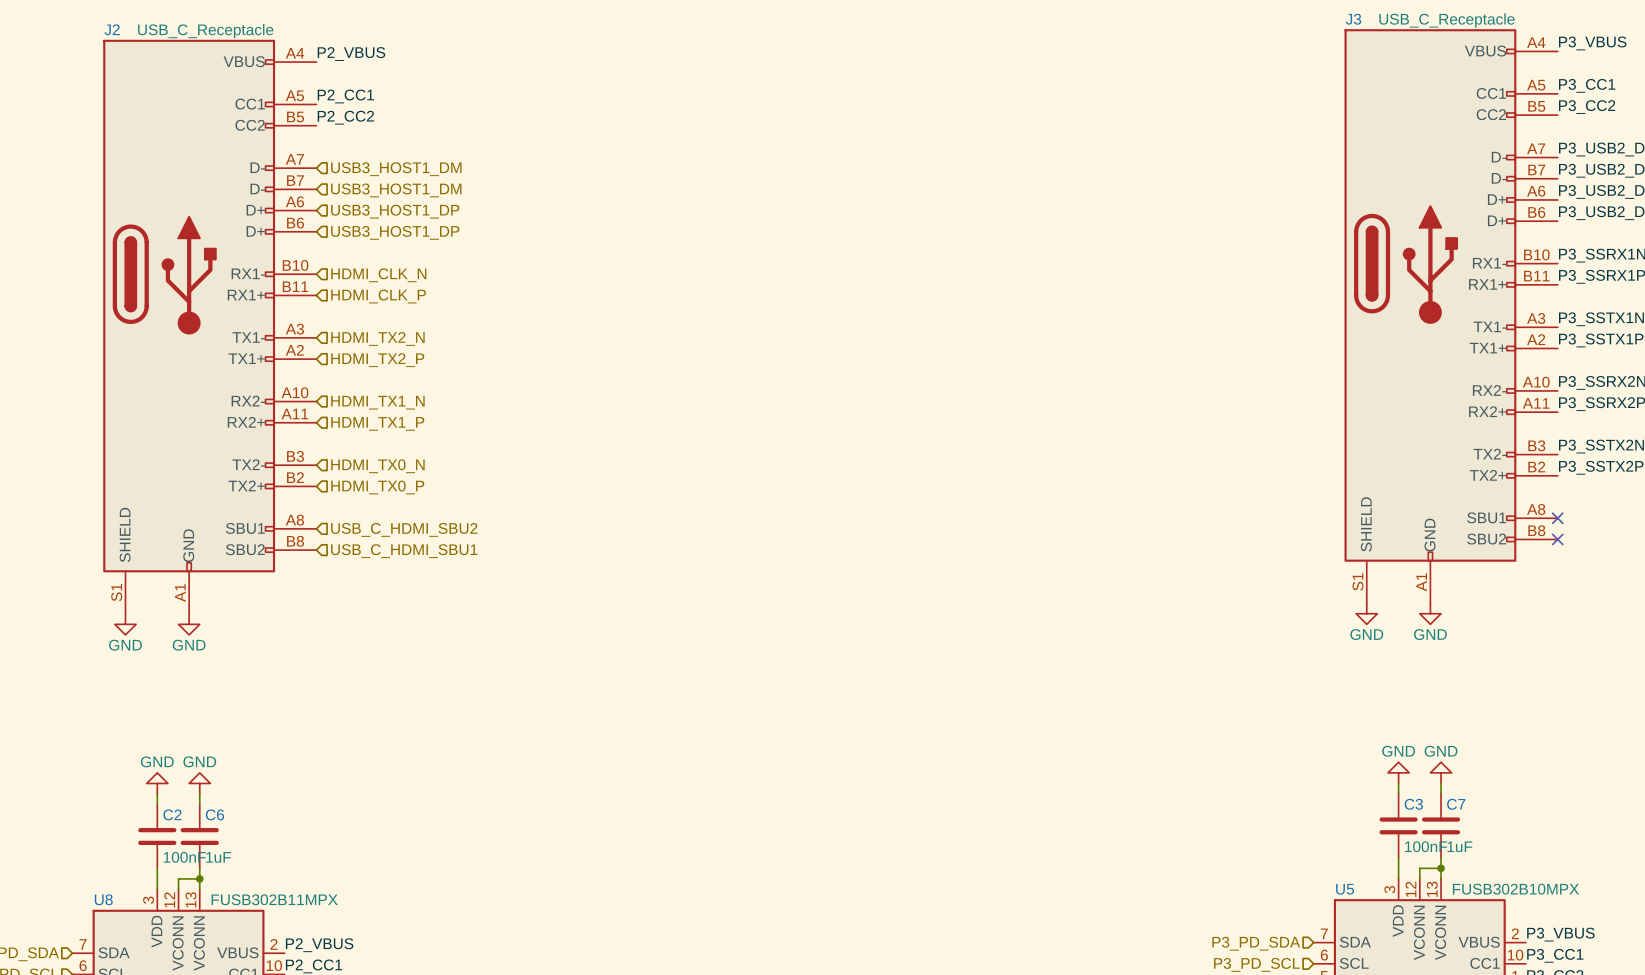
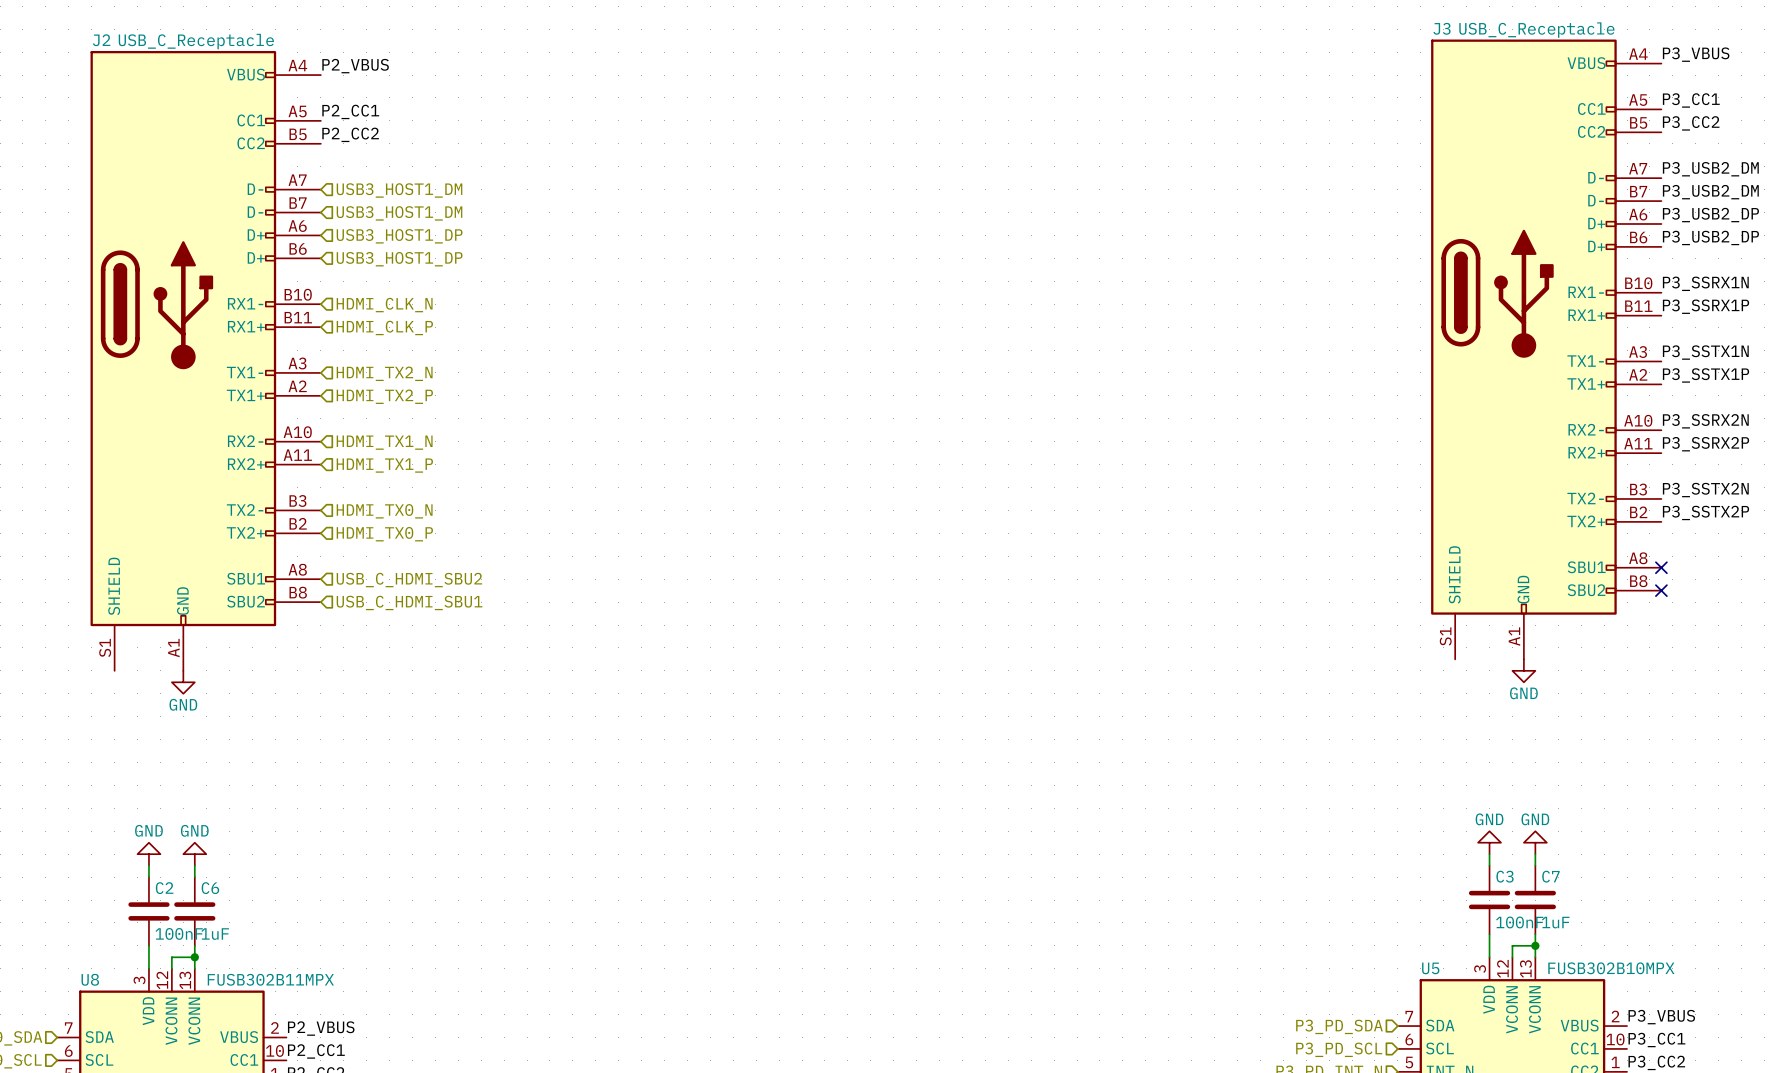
power symbol: GND (1366, 613) -> none
power symbol: GND (125, 624) -> none

